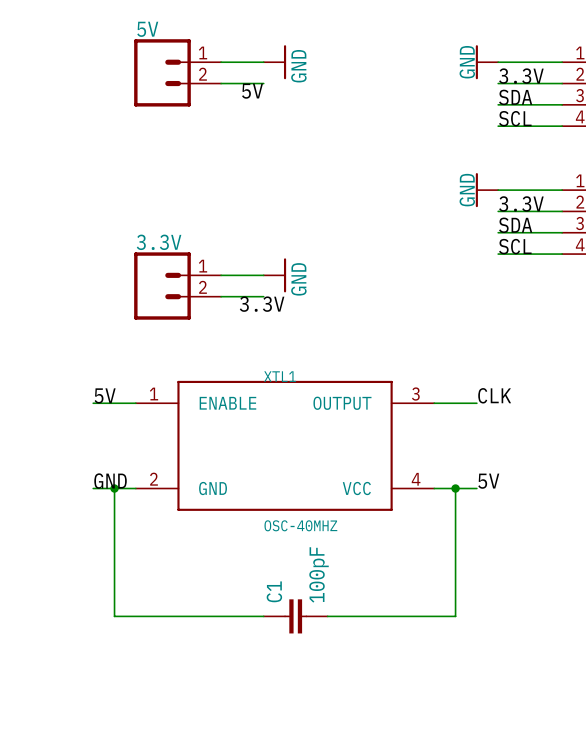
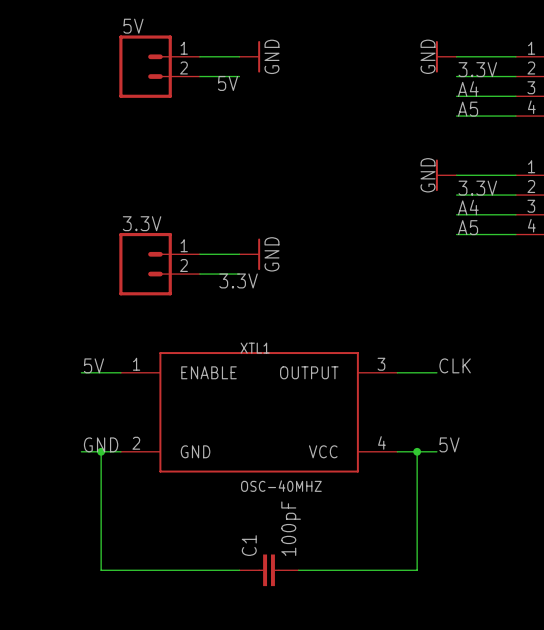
label: SDA (515, 97) -> A4 (468, 89)
label: SCL (515, 118) -> A5 (468, 109)
label: SDA (515, 225) -> A4 (468, 207)
label: SCL (515, 246) -> A5 (468, 227)

